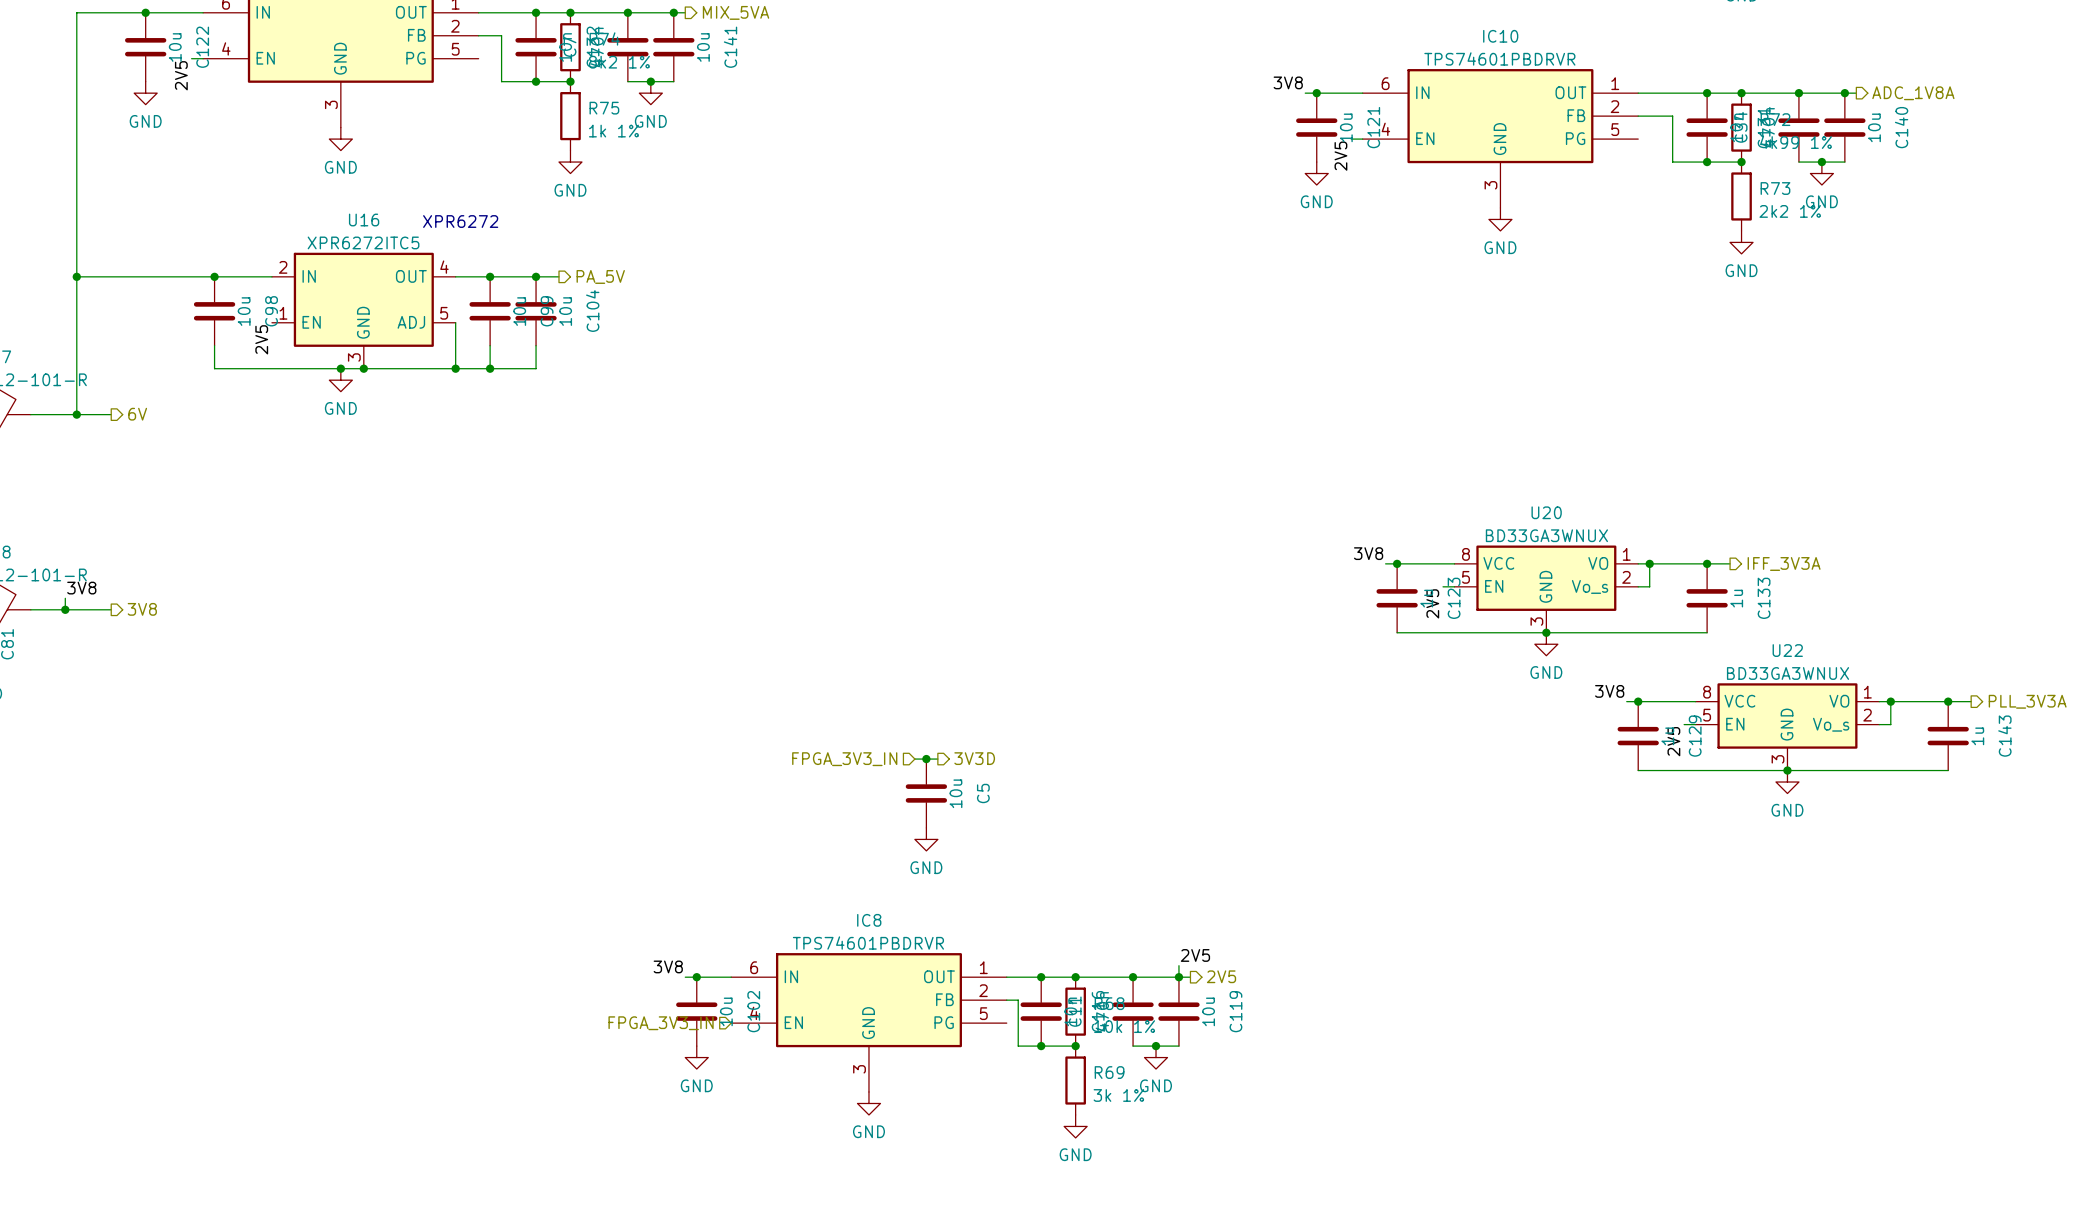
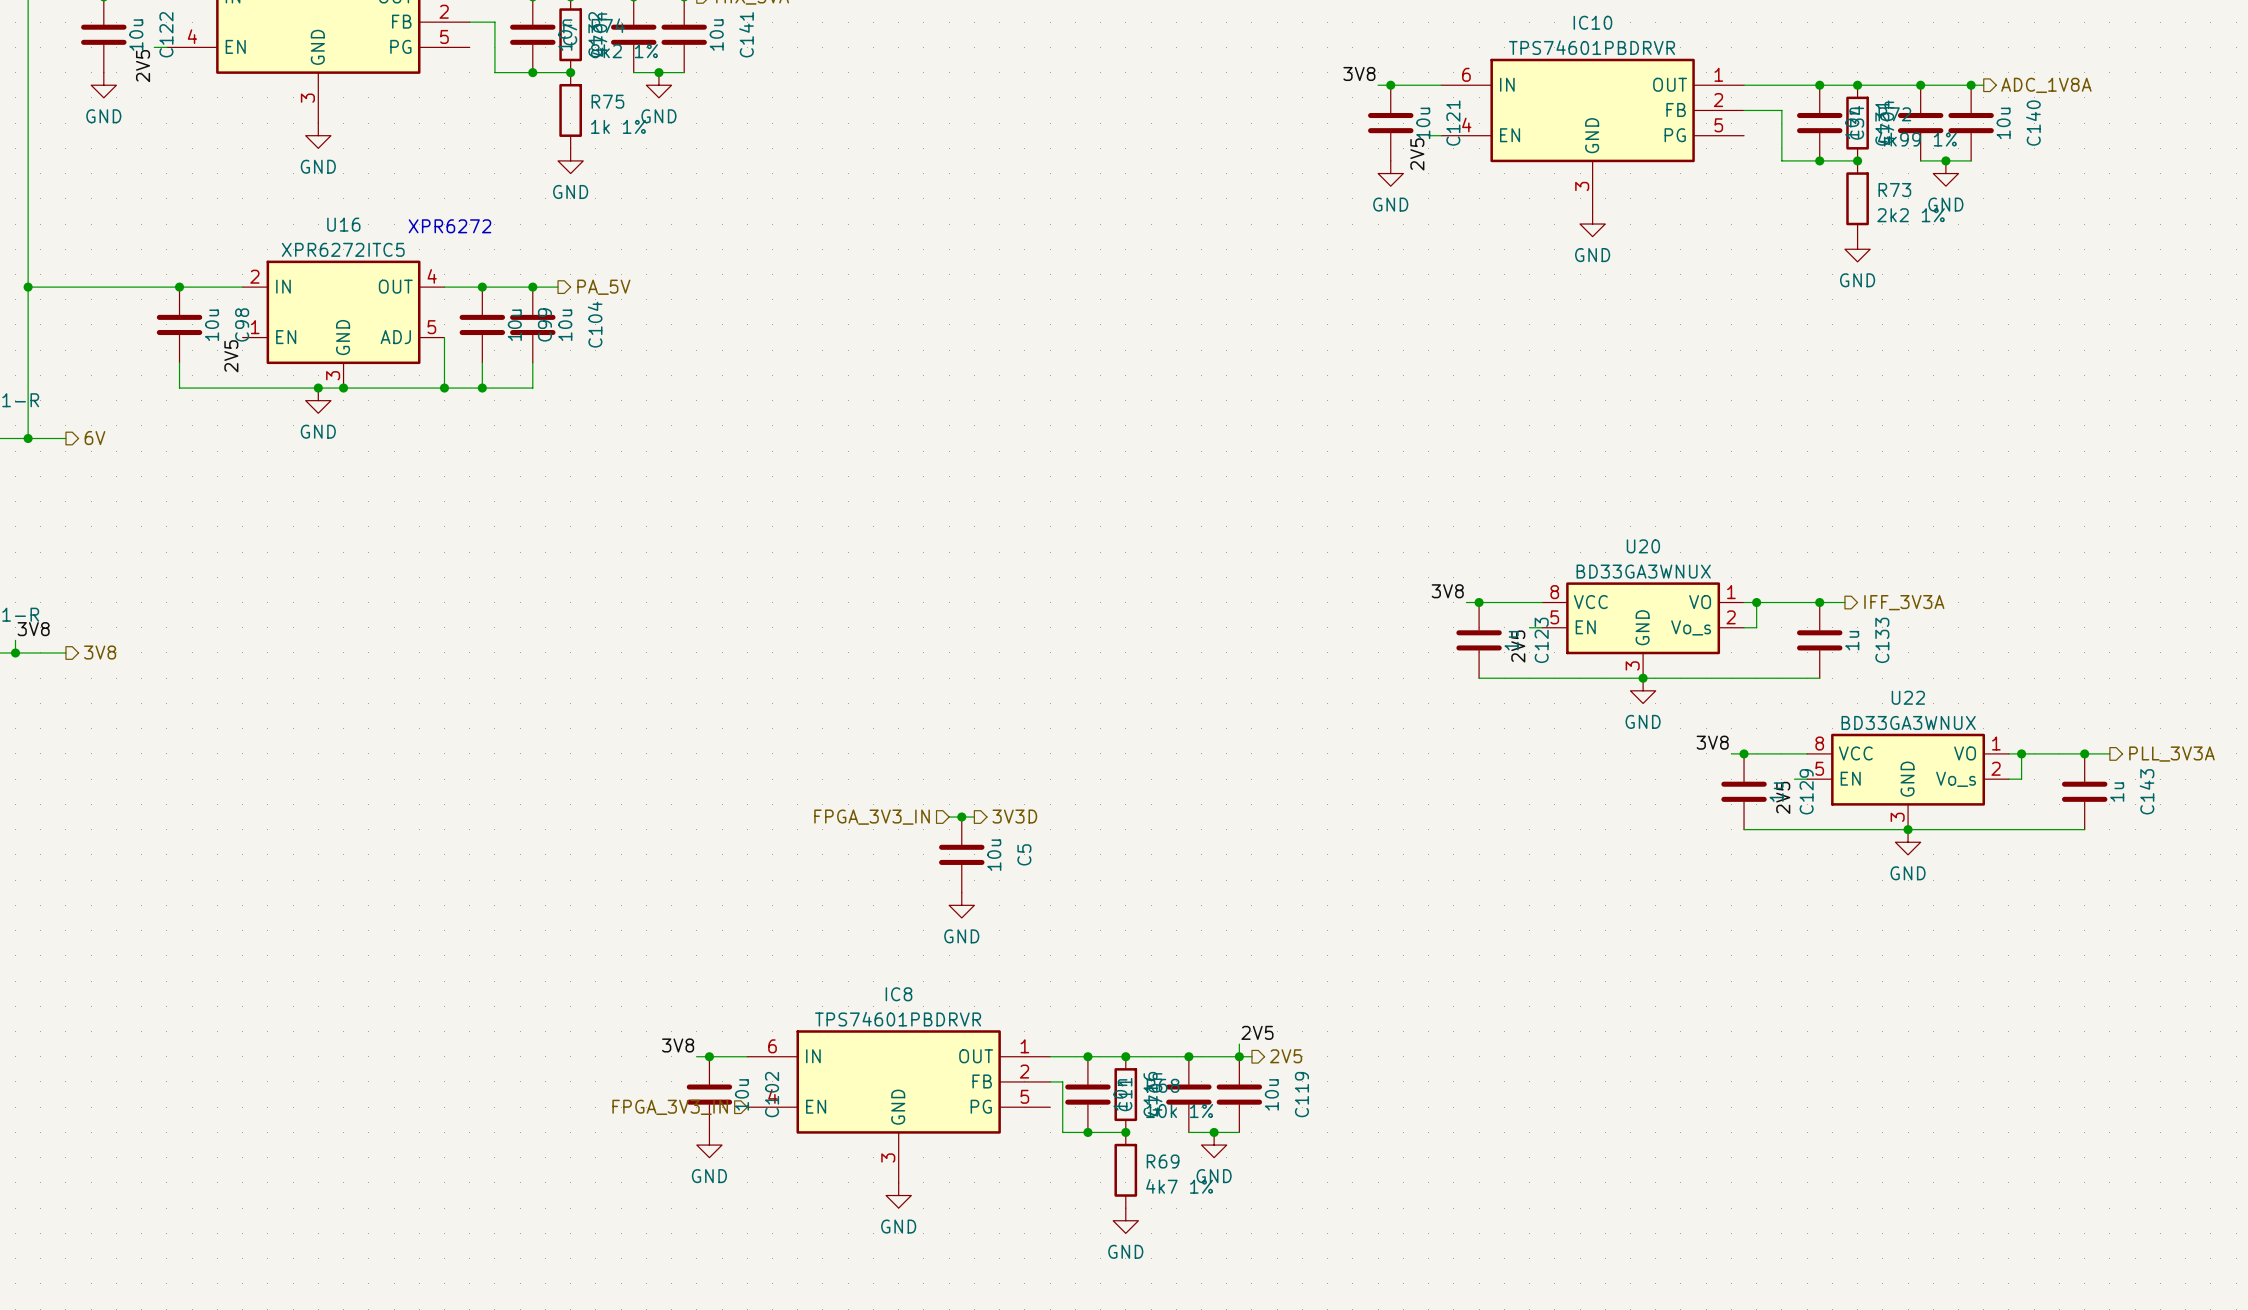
R69 value: 3k 1% (1118, 1095) -> 4k7 1% (1179, 1186)

